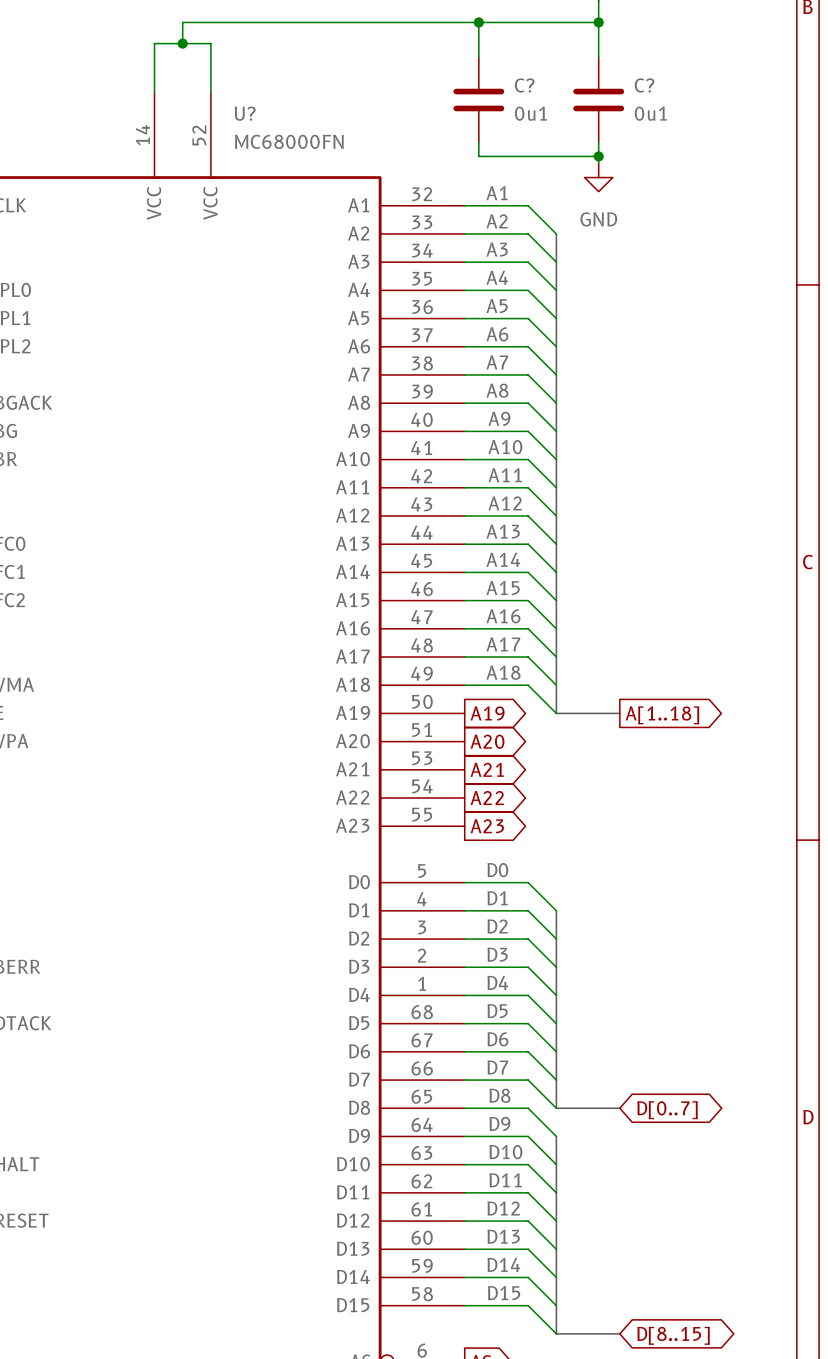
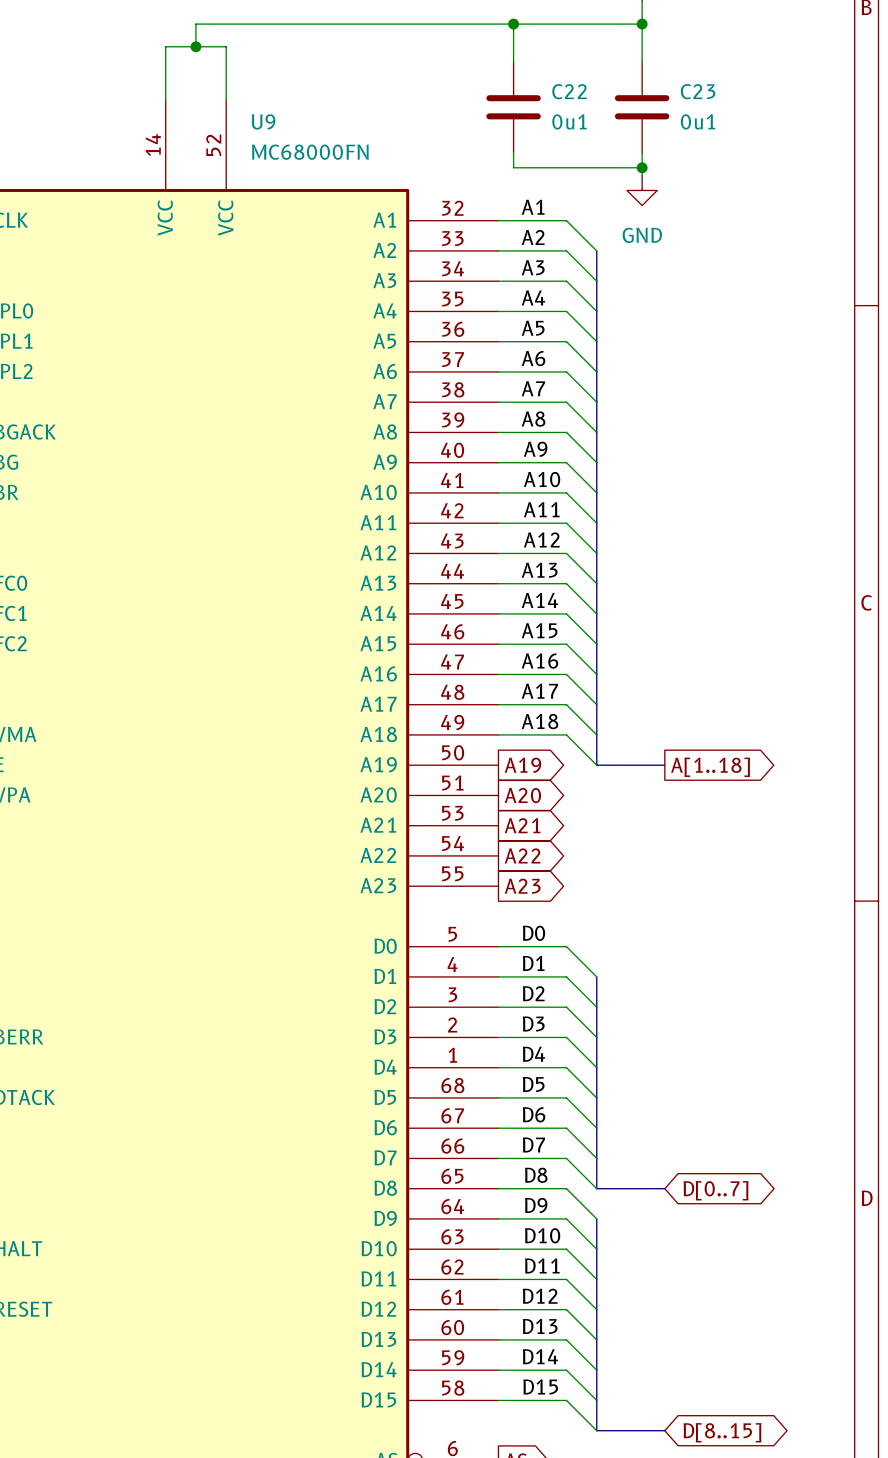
C? name: C? (524, 85) -> C22 (569, 91)
C? name: C? (644, 85) -> C23 (698, 91)
U? name: U? (245, 113) -> U9 (263, 121)

